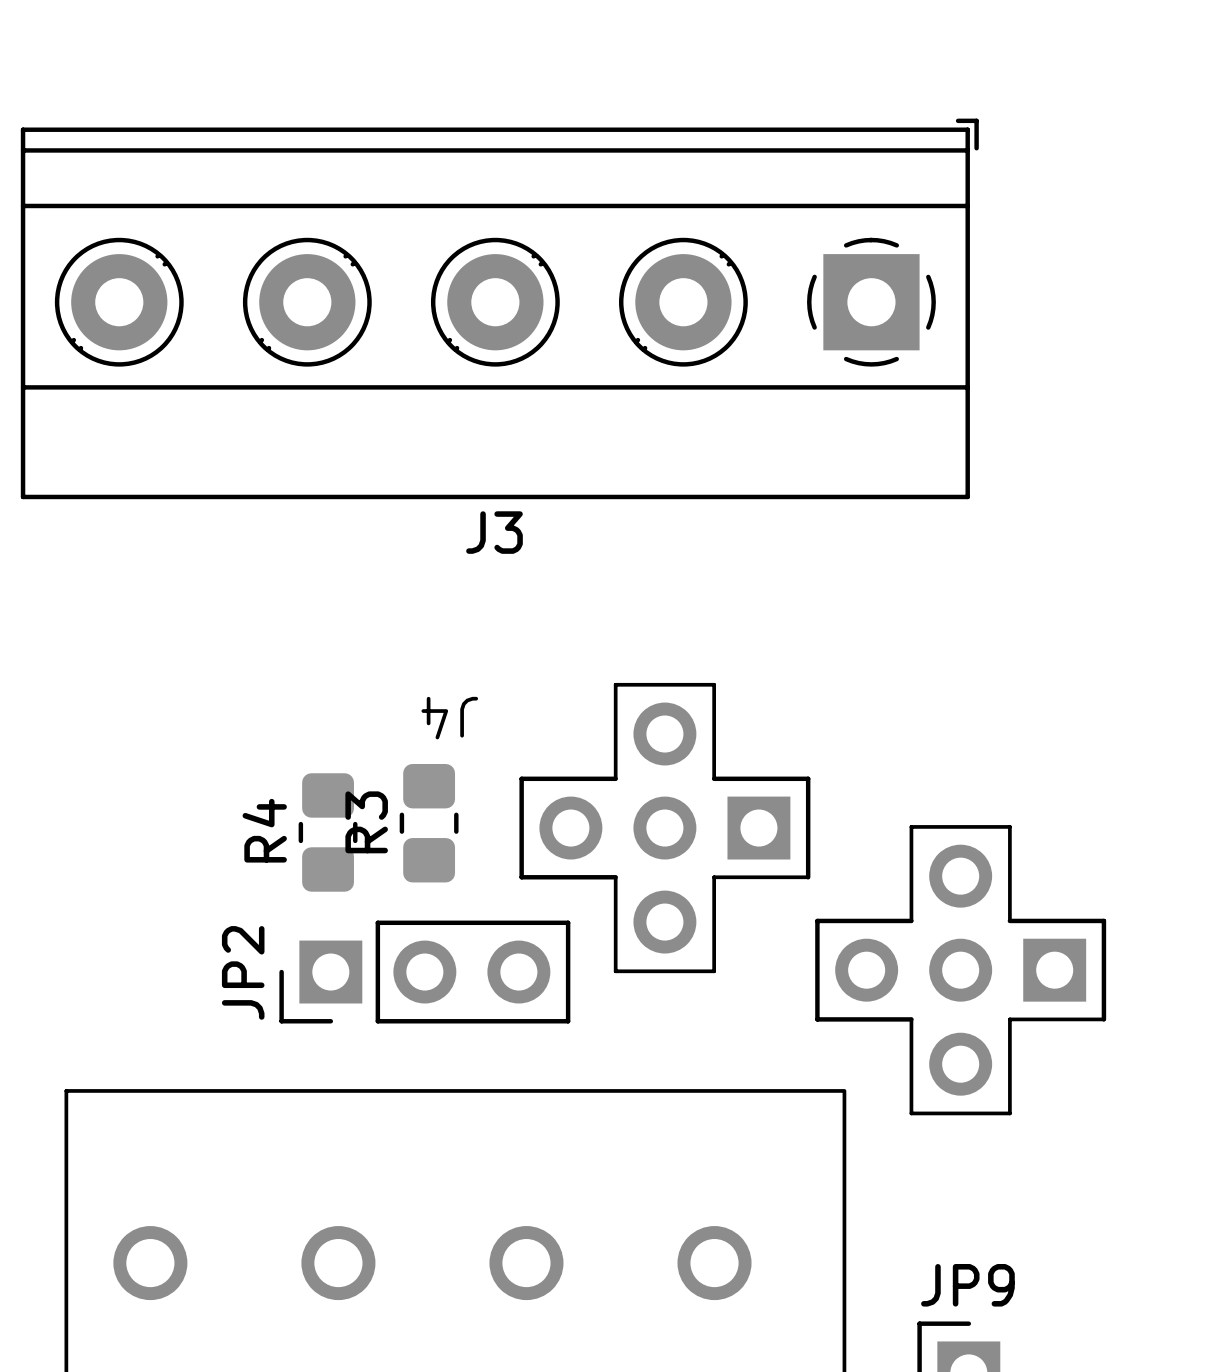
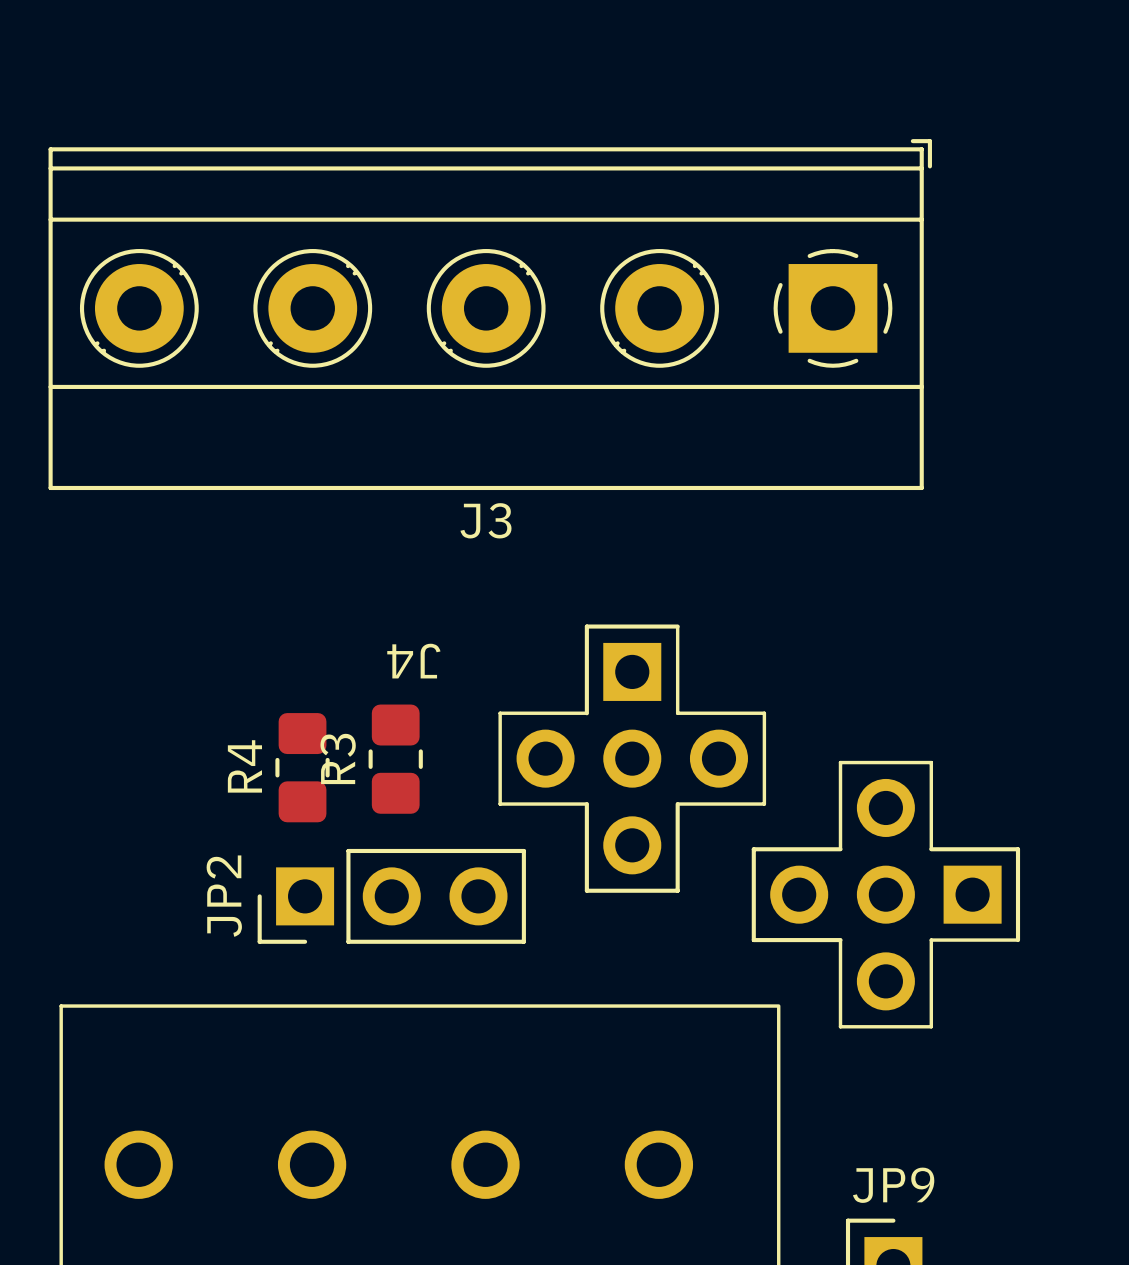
J3 position: (499, 308) -> (490, 314)
part rotation: 0° (664, 828) -> 90° counterclockwise (632, 758)

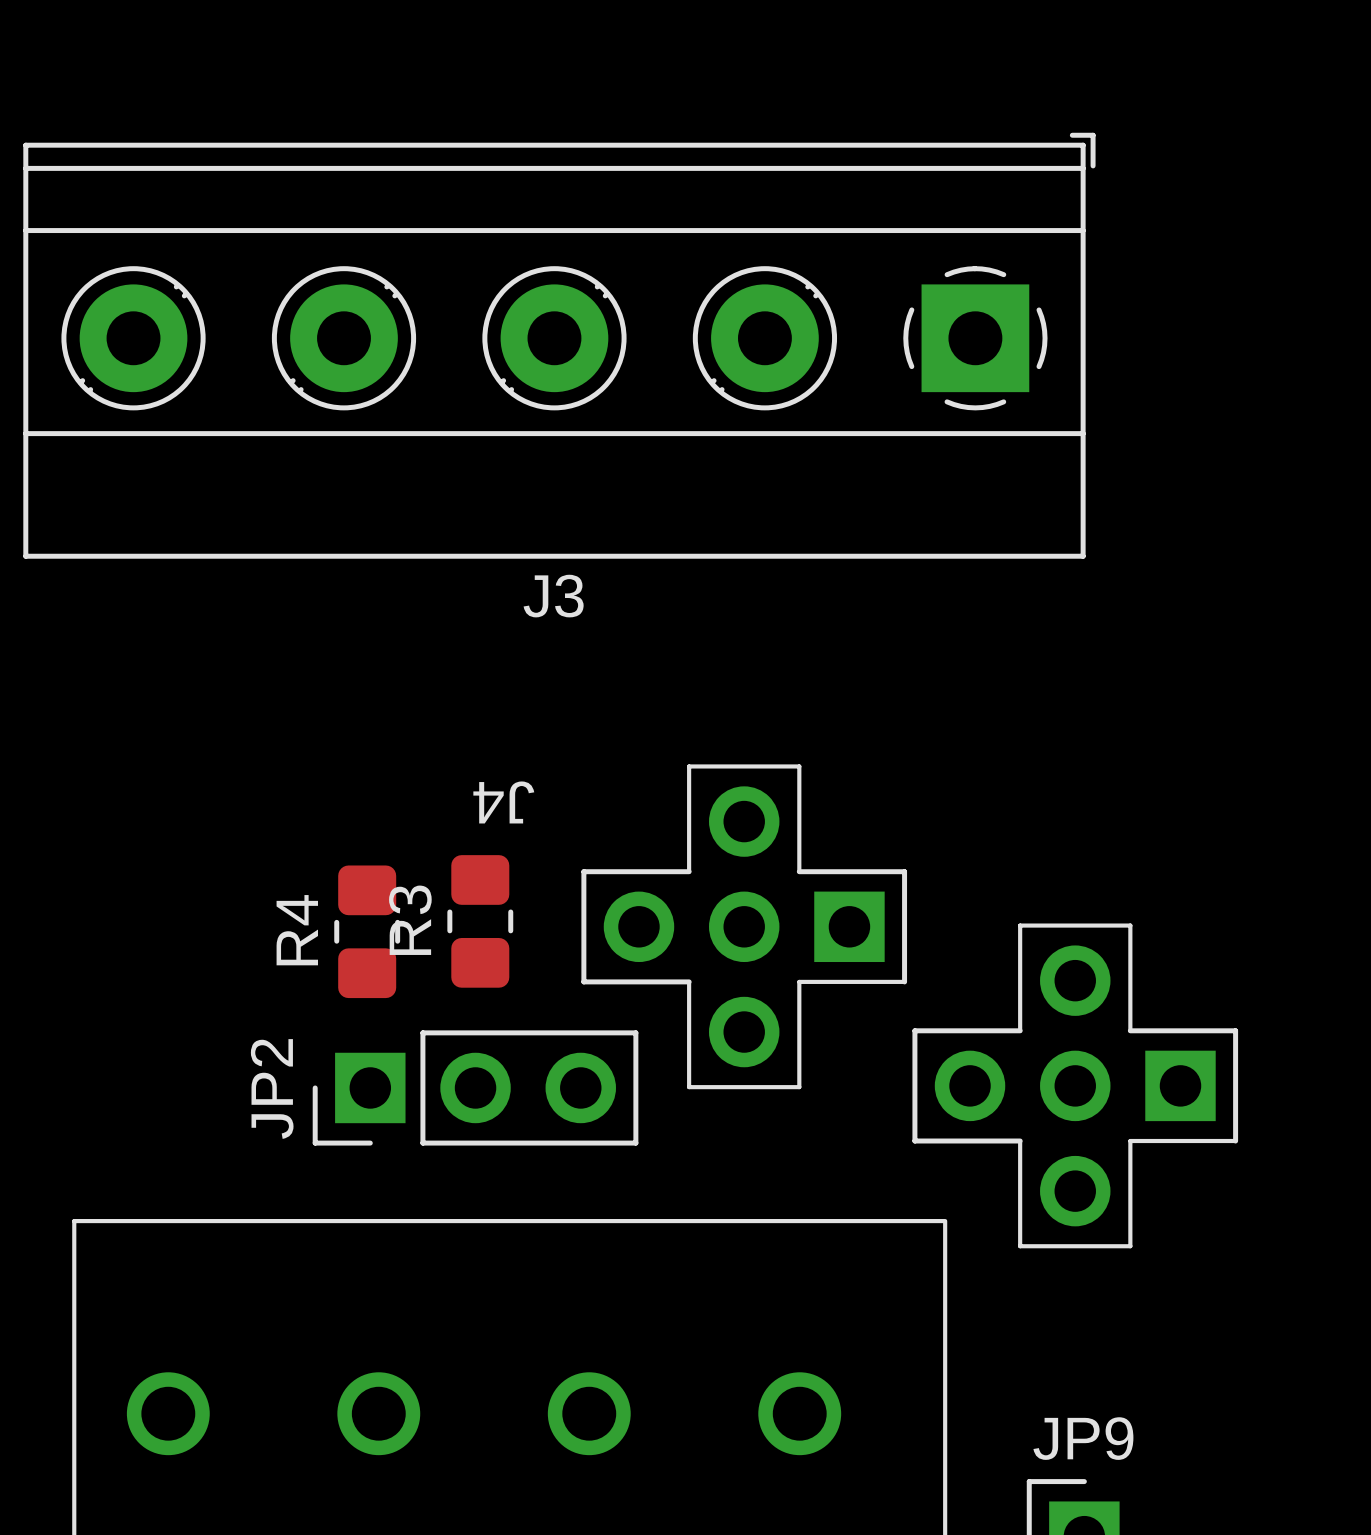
J3 position: (490, 314) -> (559, 345)
part rotation: 0° (632, 758) -> 90° clockwise (744, 926)

